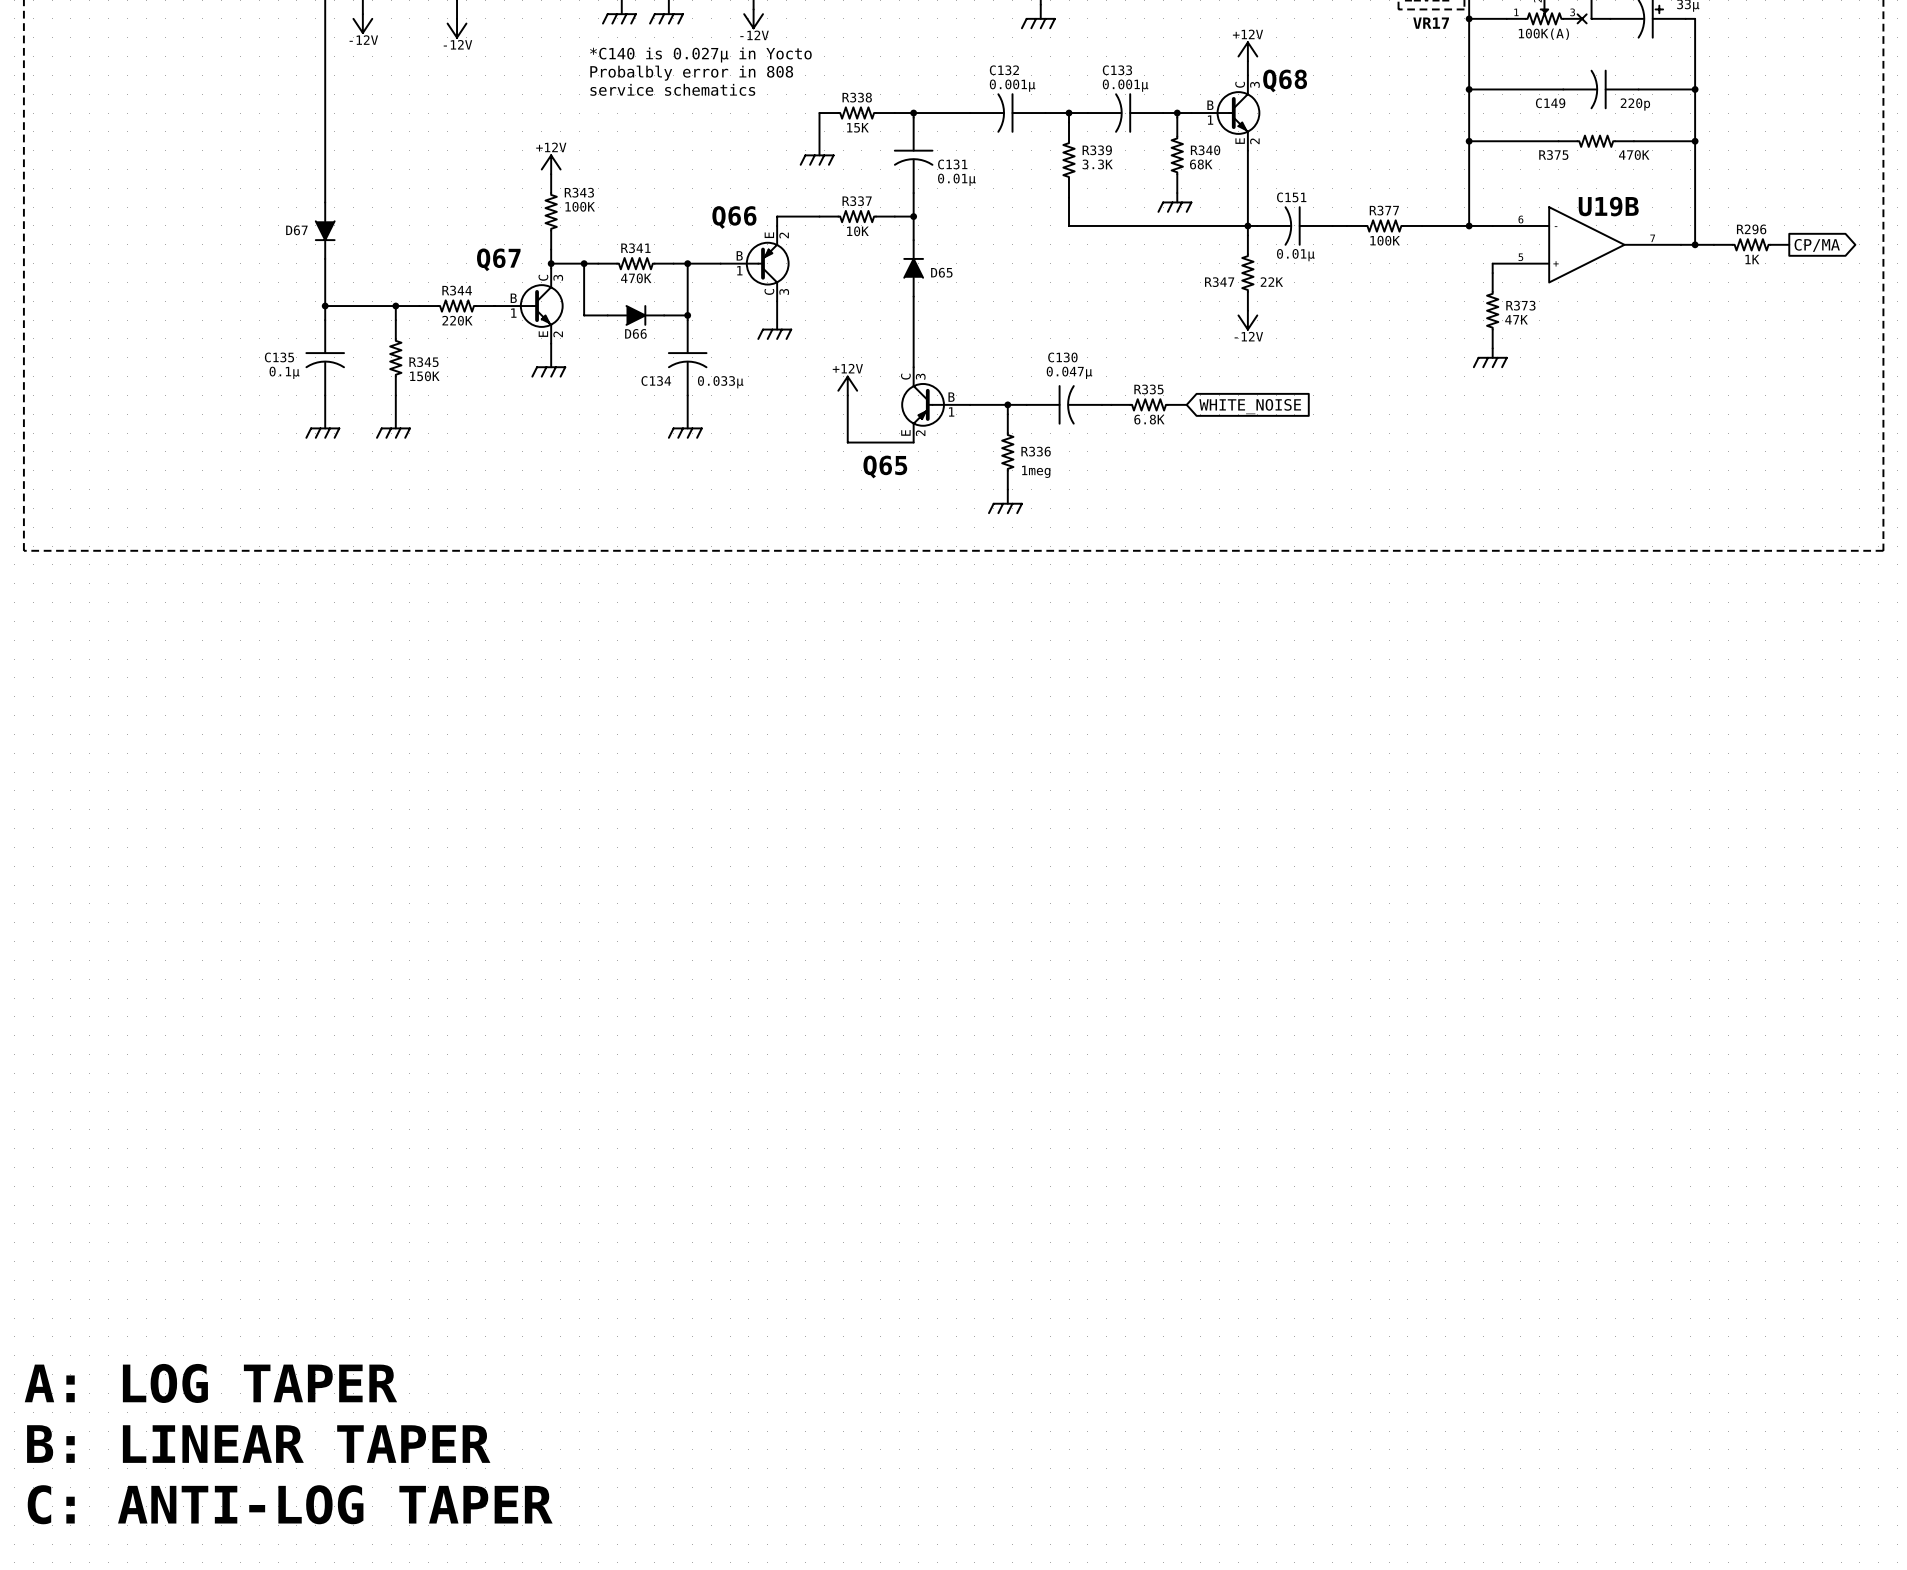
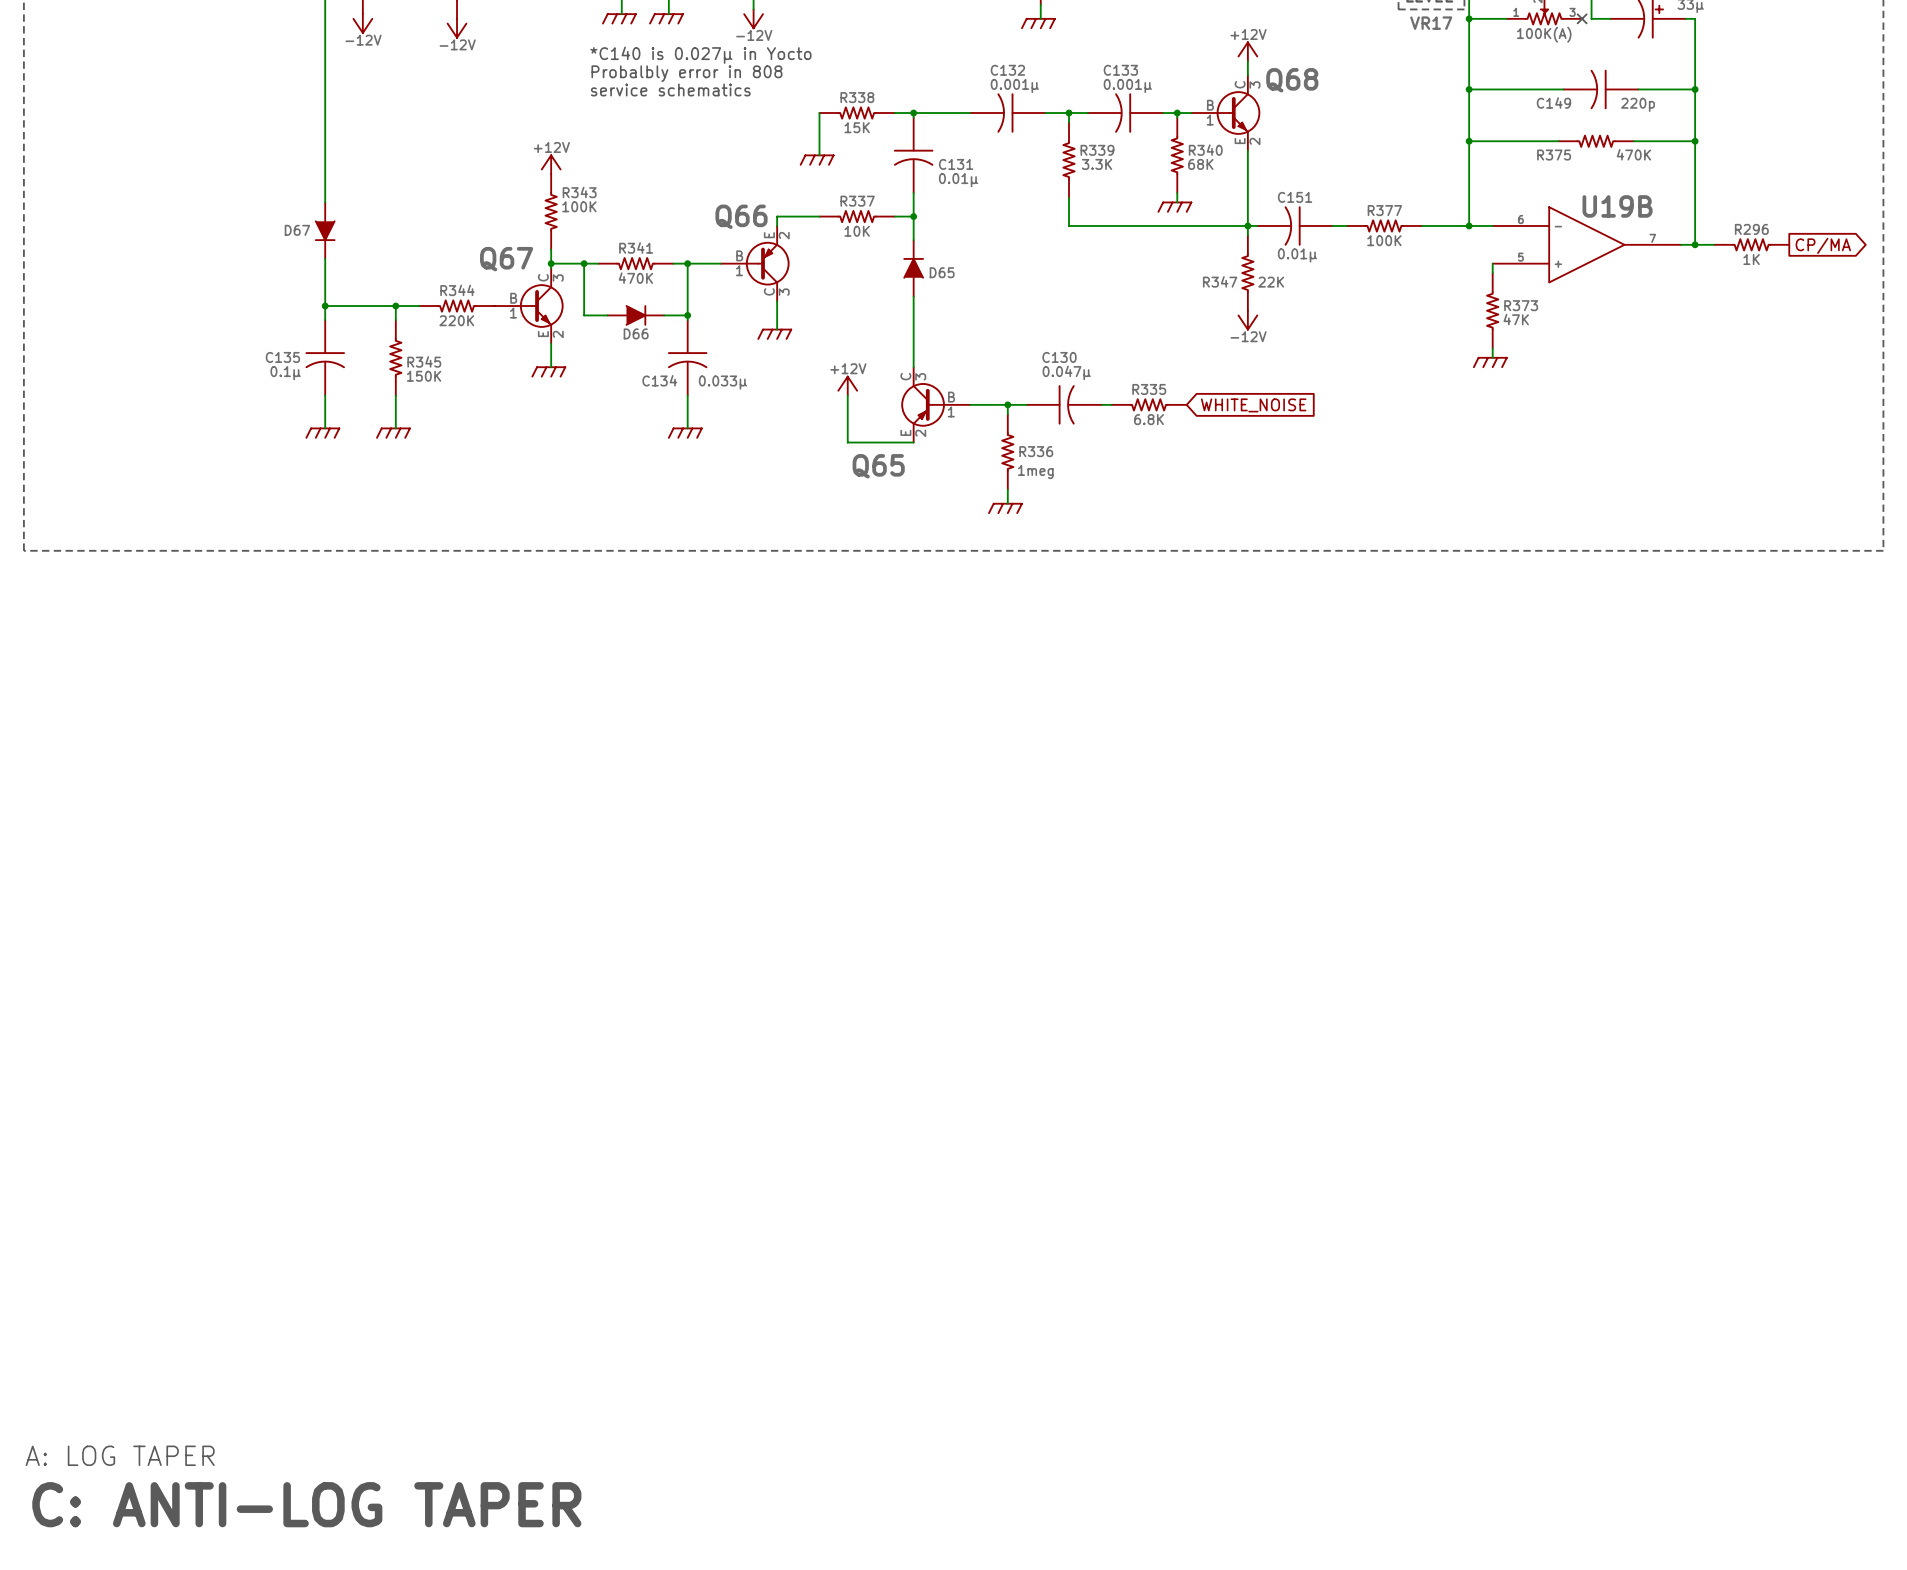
text: A: LOG TAPER (210, 1383) -> none
text: B: LINEAR TAPER (258, 1444) -> A: LOG TAPER (120, 1455)

